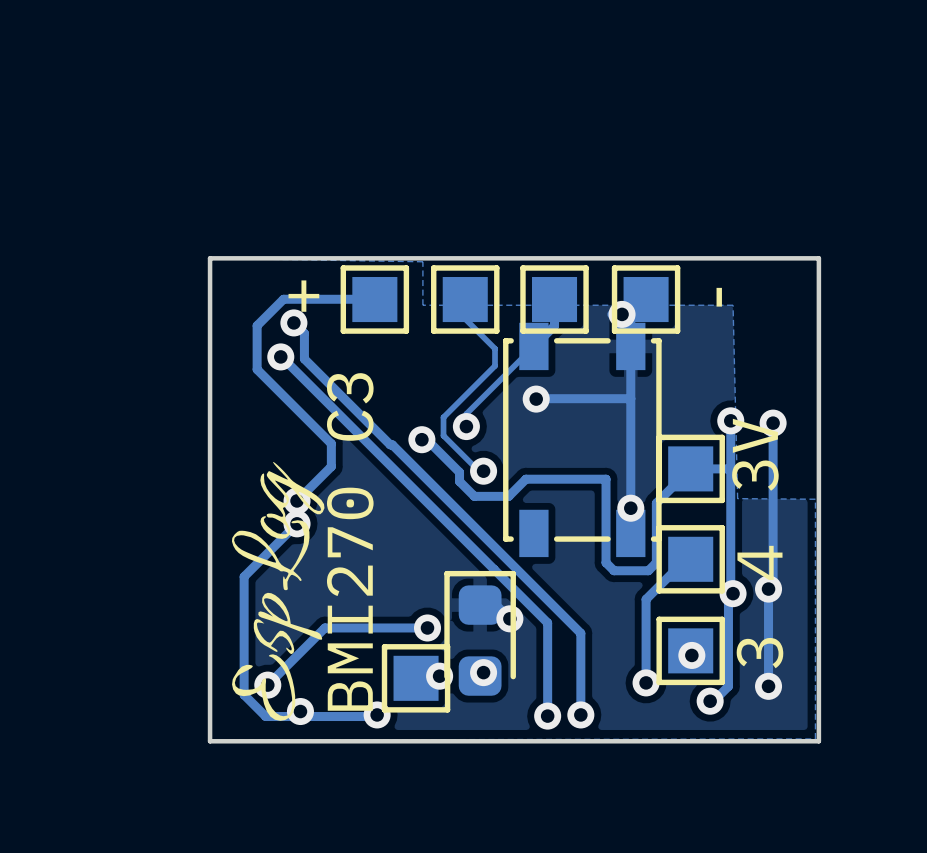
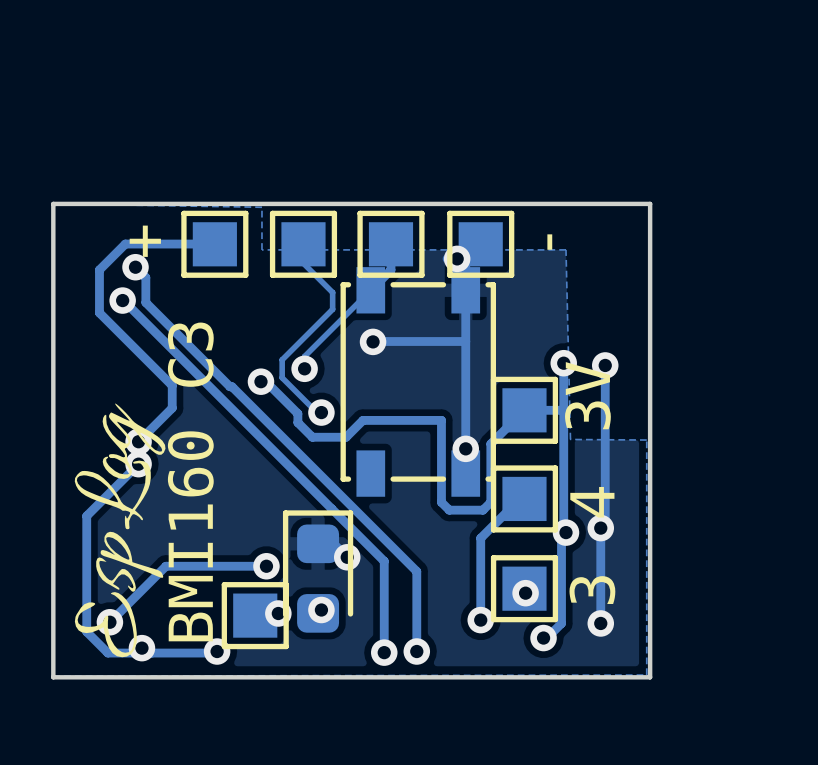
text: BMI270 C3 (350, 541) -> BMI160 C3 (190, 481)

